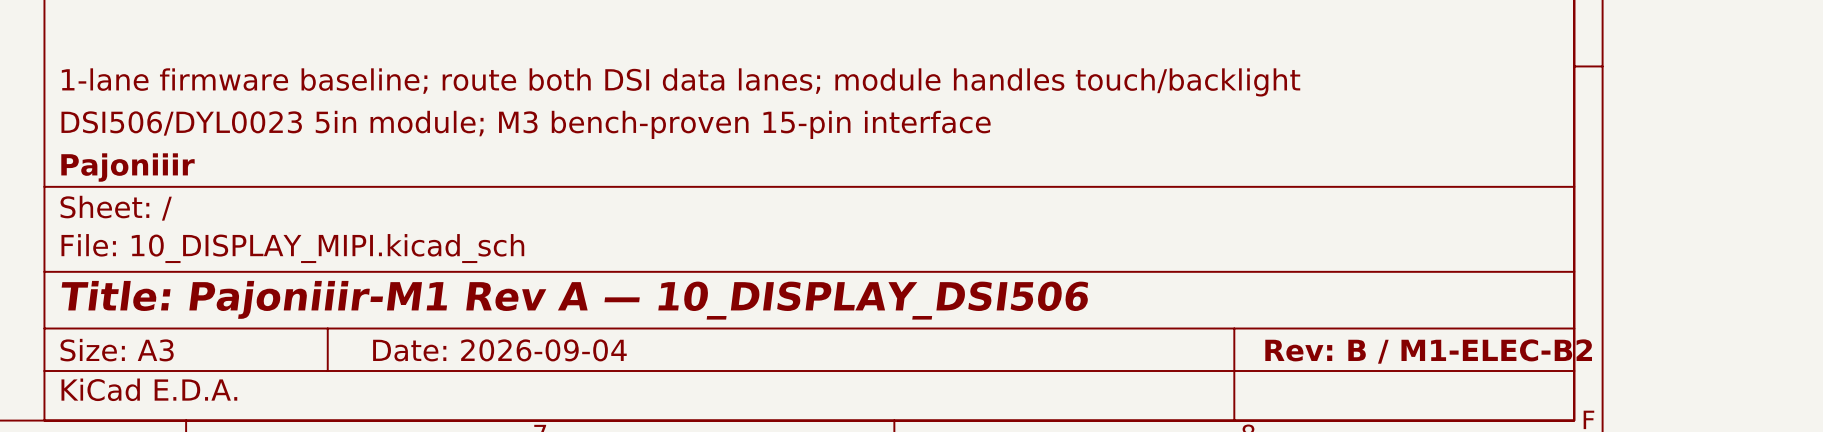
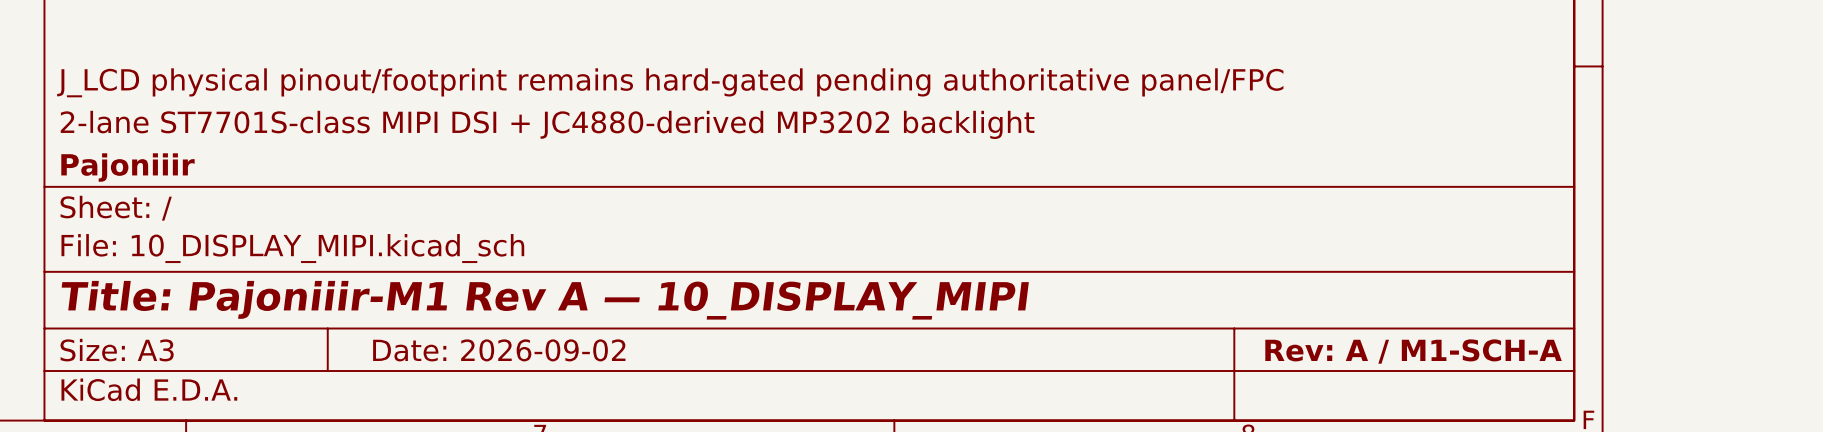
title block: 1-lane firmware baseline; route both DSI data lanes; module handles touch/backlight (681, 82) -> J_LCD physical pinout/footprint remains hard-gated pending authoritative panel/FPC (670, 82)
title block: DSI506/DYL0023 5in module; M3 bench-proven 15-pin interface (526, 124) -> 2-lane ST7701S-class MIPI DSI + JC4880-derived MP3202 backlight (547, 124)
title block: Title: Pajoniiir-M1 Rev A — 10_DISPLAY_DSI506 (574, 300) -> Title: Pajoniiir-M1 Rev A — 10_DISPLAY_MIPI (545, 300)
title block: Date: 2026-09-04 (499, 350) -> Date: 2026-09-02 (499, 350)
title block: Rev: B / M1-ELEC-B2 (1428, 351) -> Rev: A / M1-SCH-A (1413, 351)

